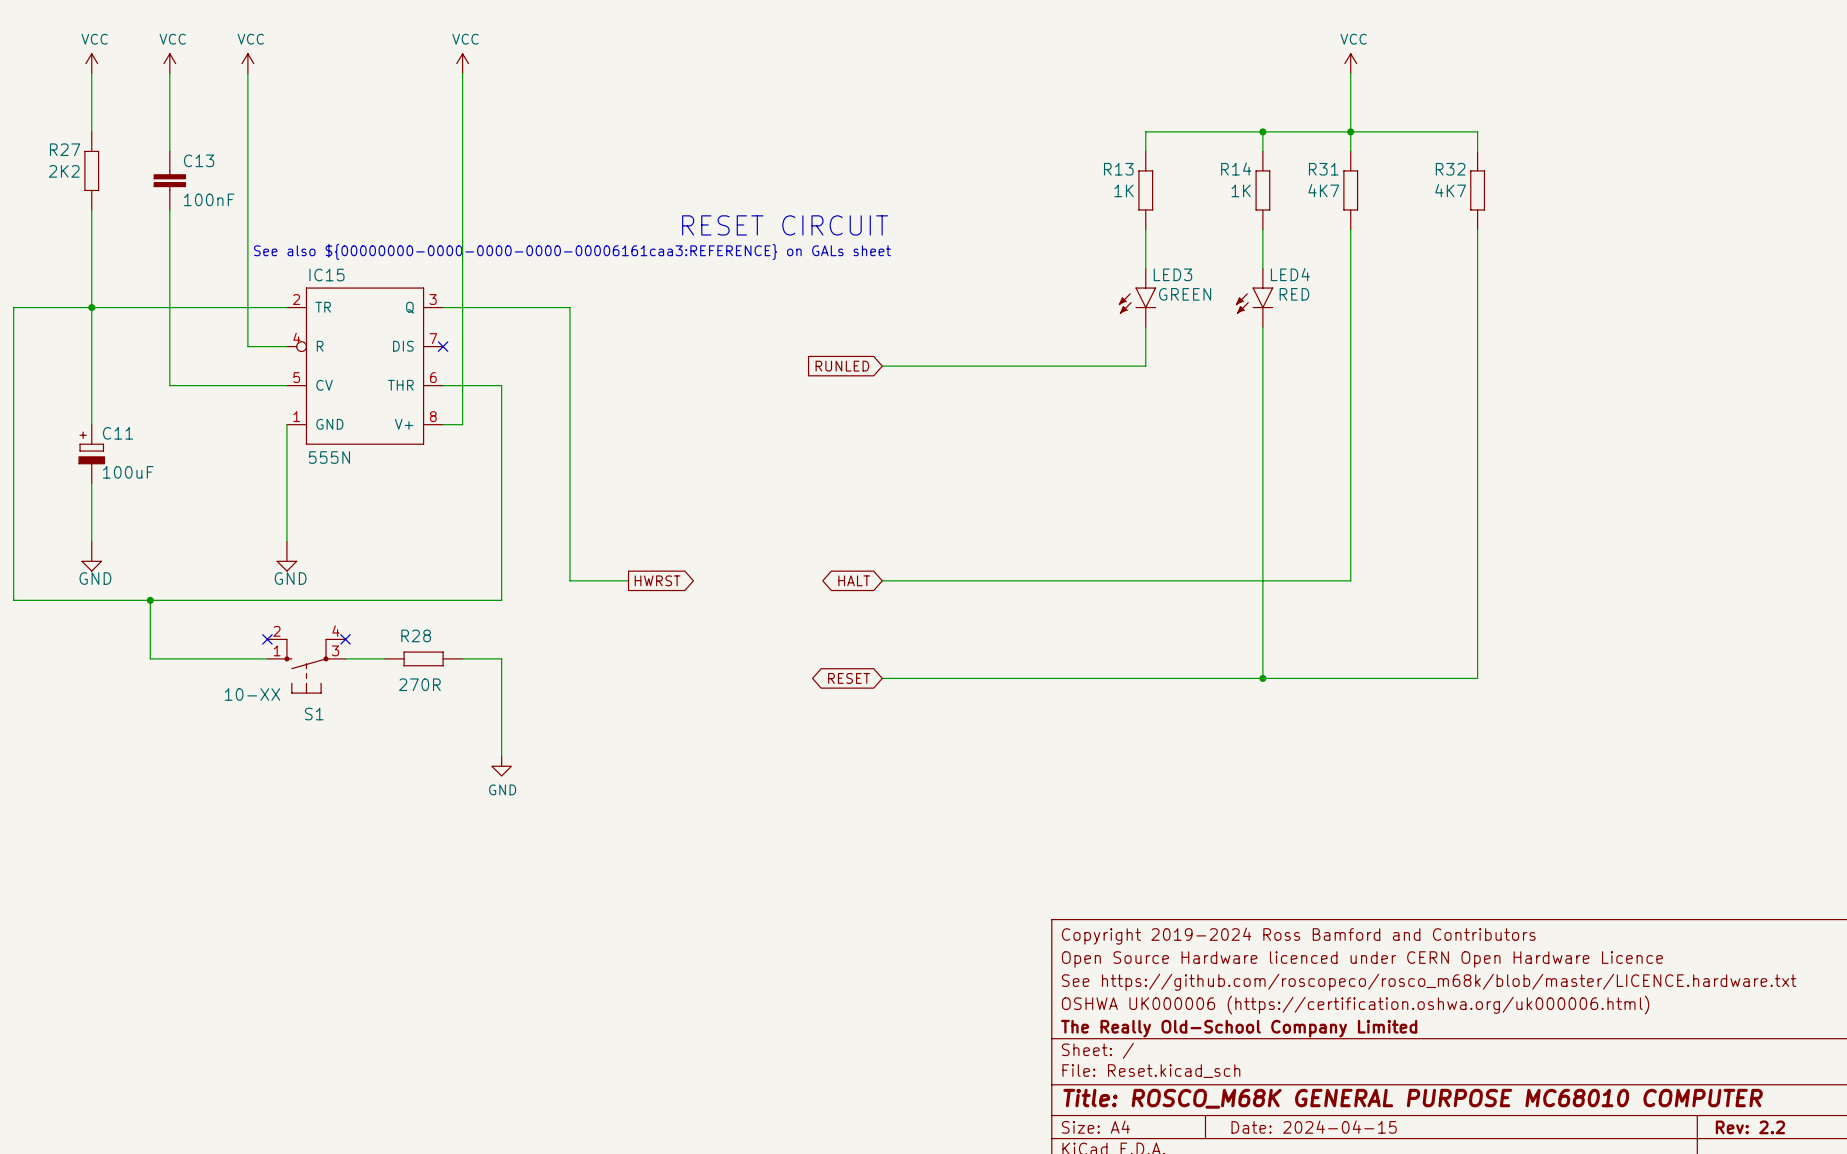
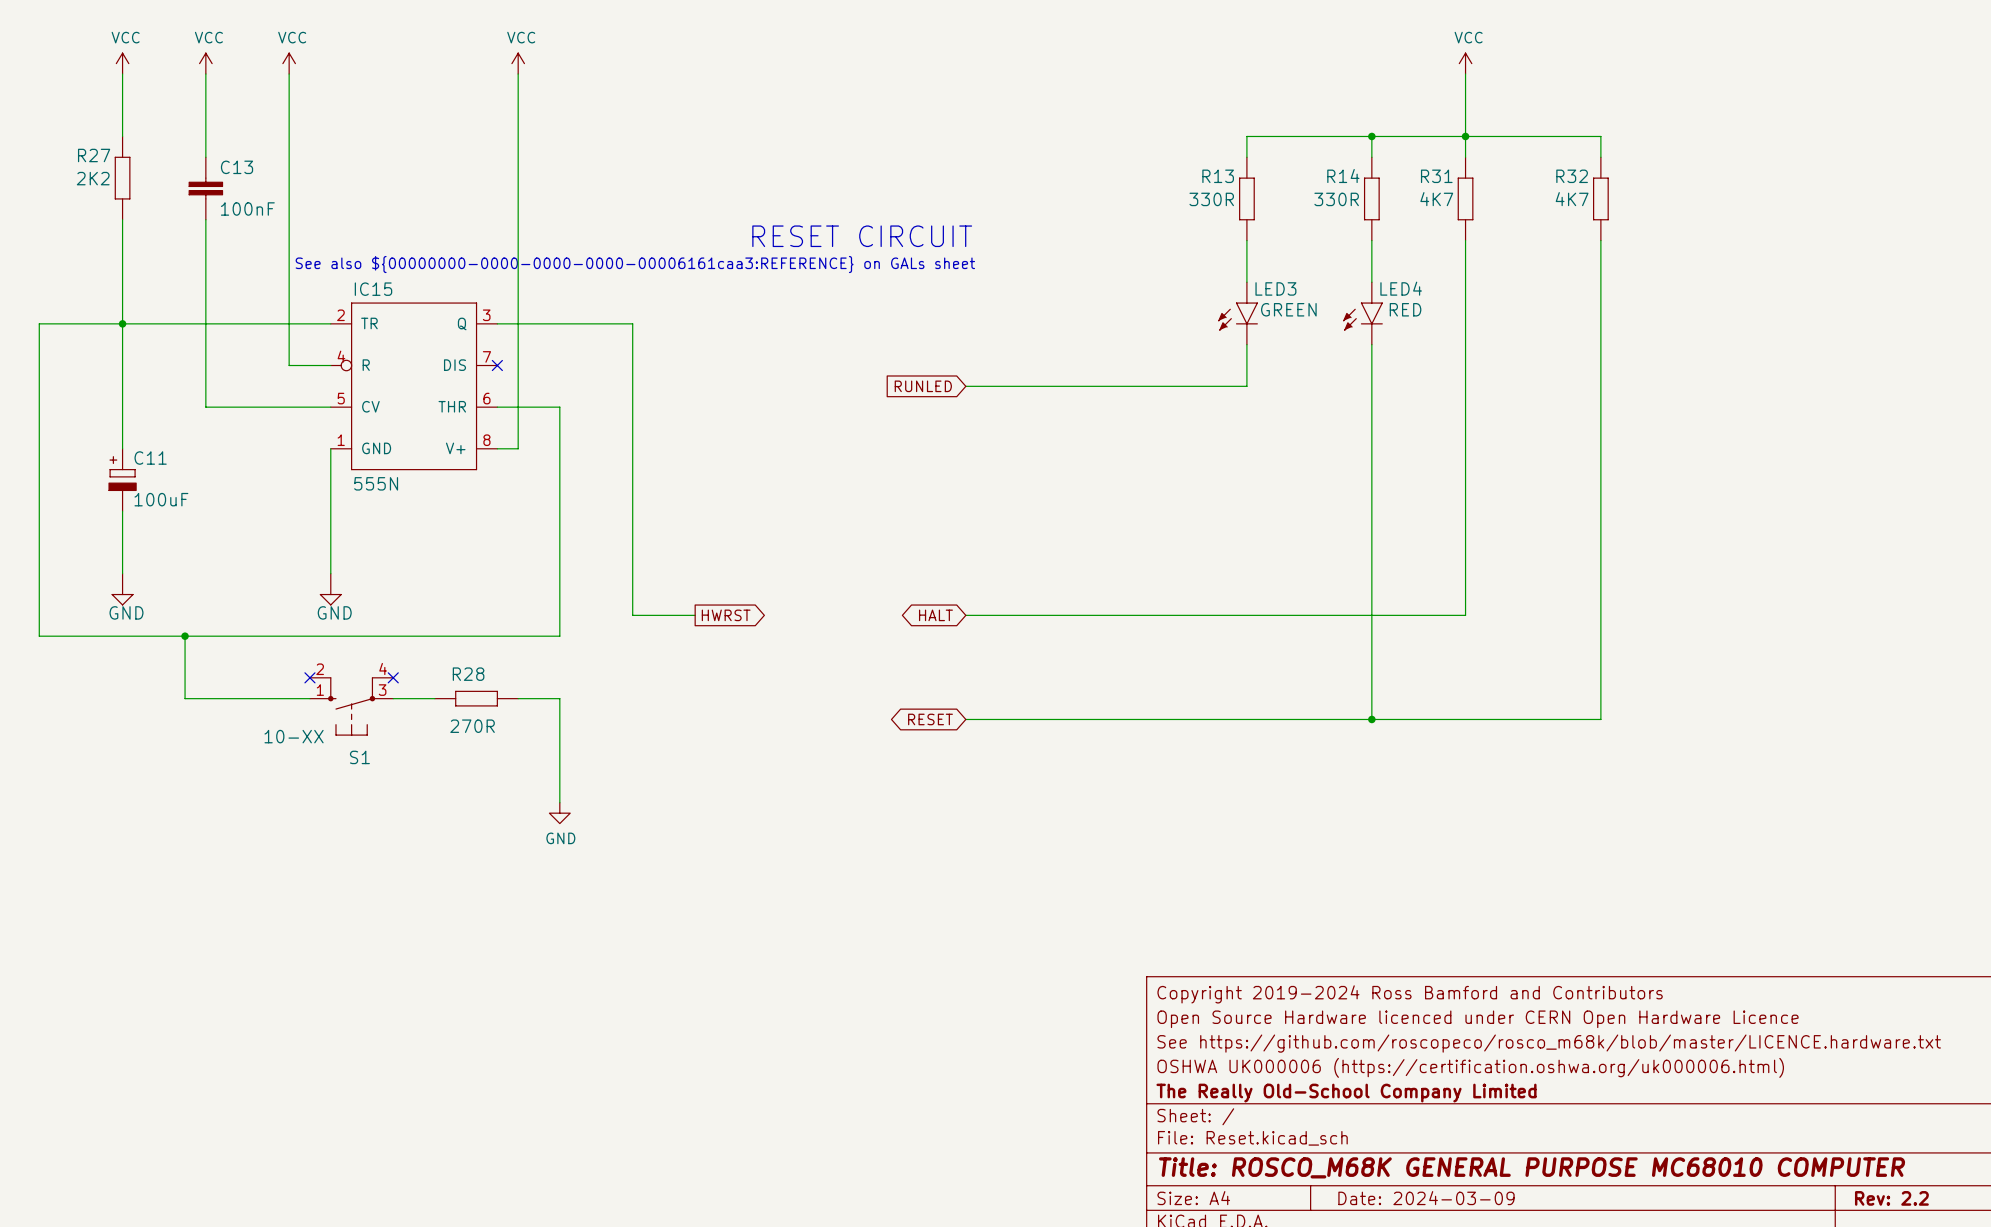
R13 value: 1K (1124, 190) -> 330R (1211, 199)
R14 value: 1K (1241, 190) -> 330R (1336, 199)
title block: Date: 2024-04-15 (1314, 1127) -> Date: 2024-03-09 (1426, 1198)

